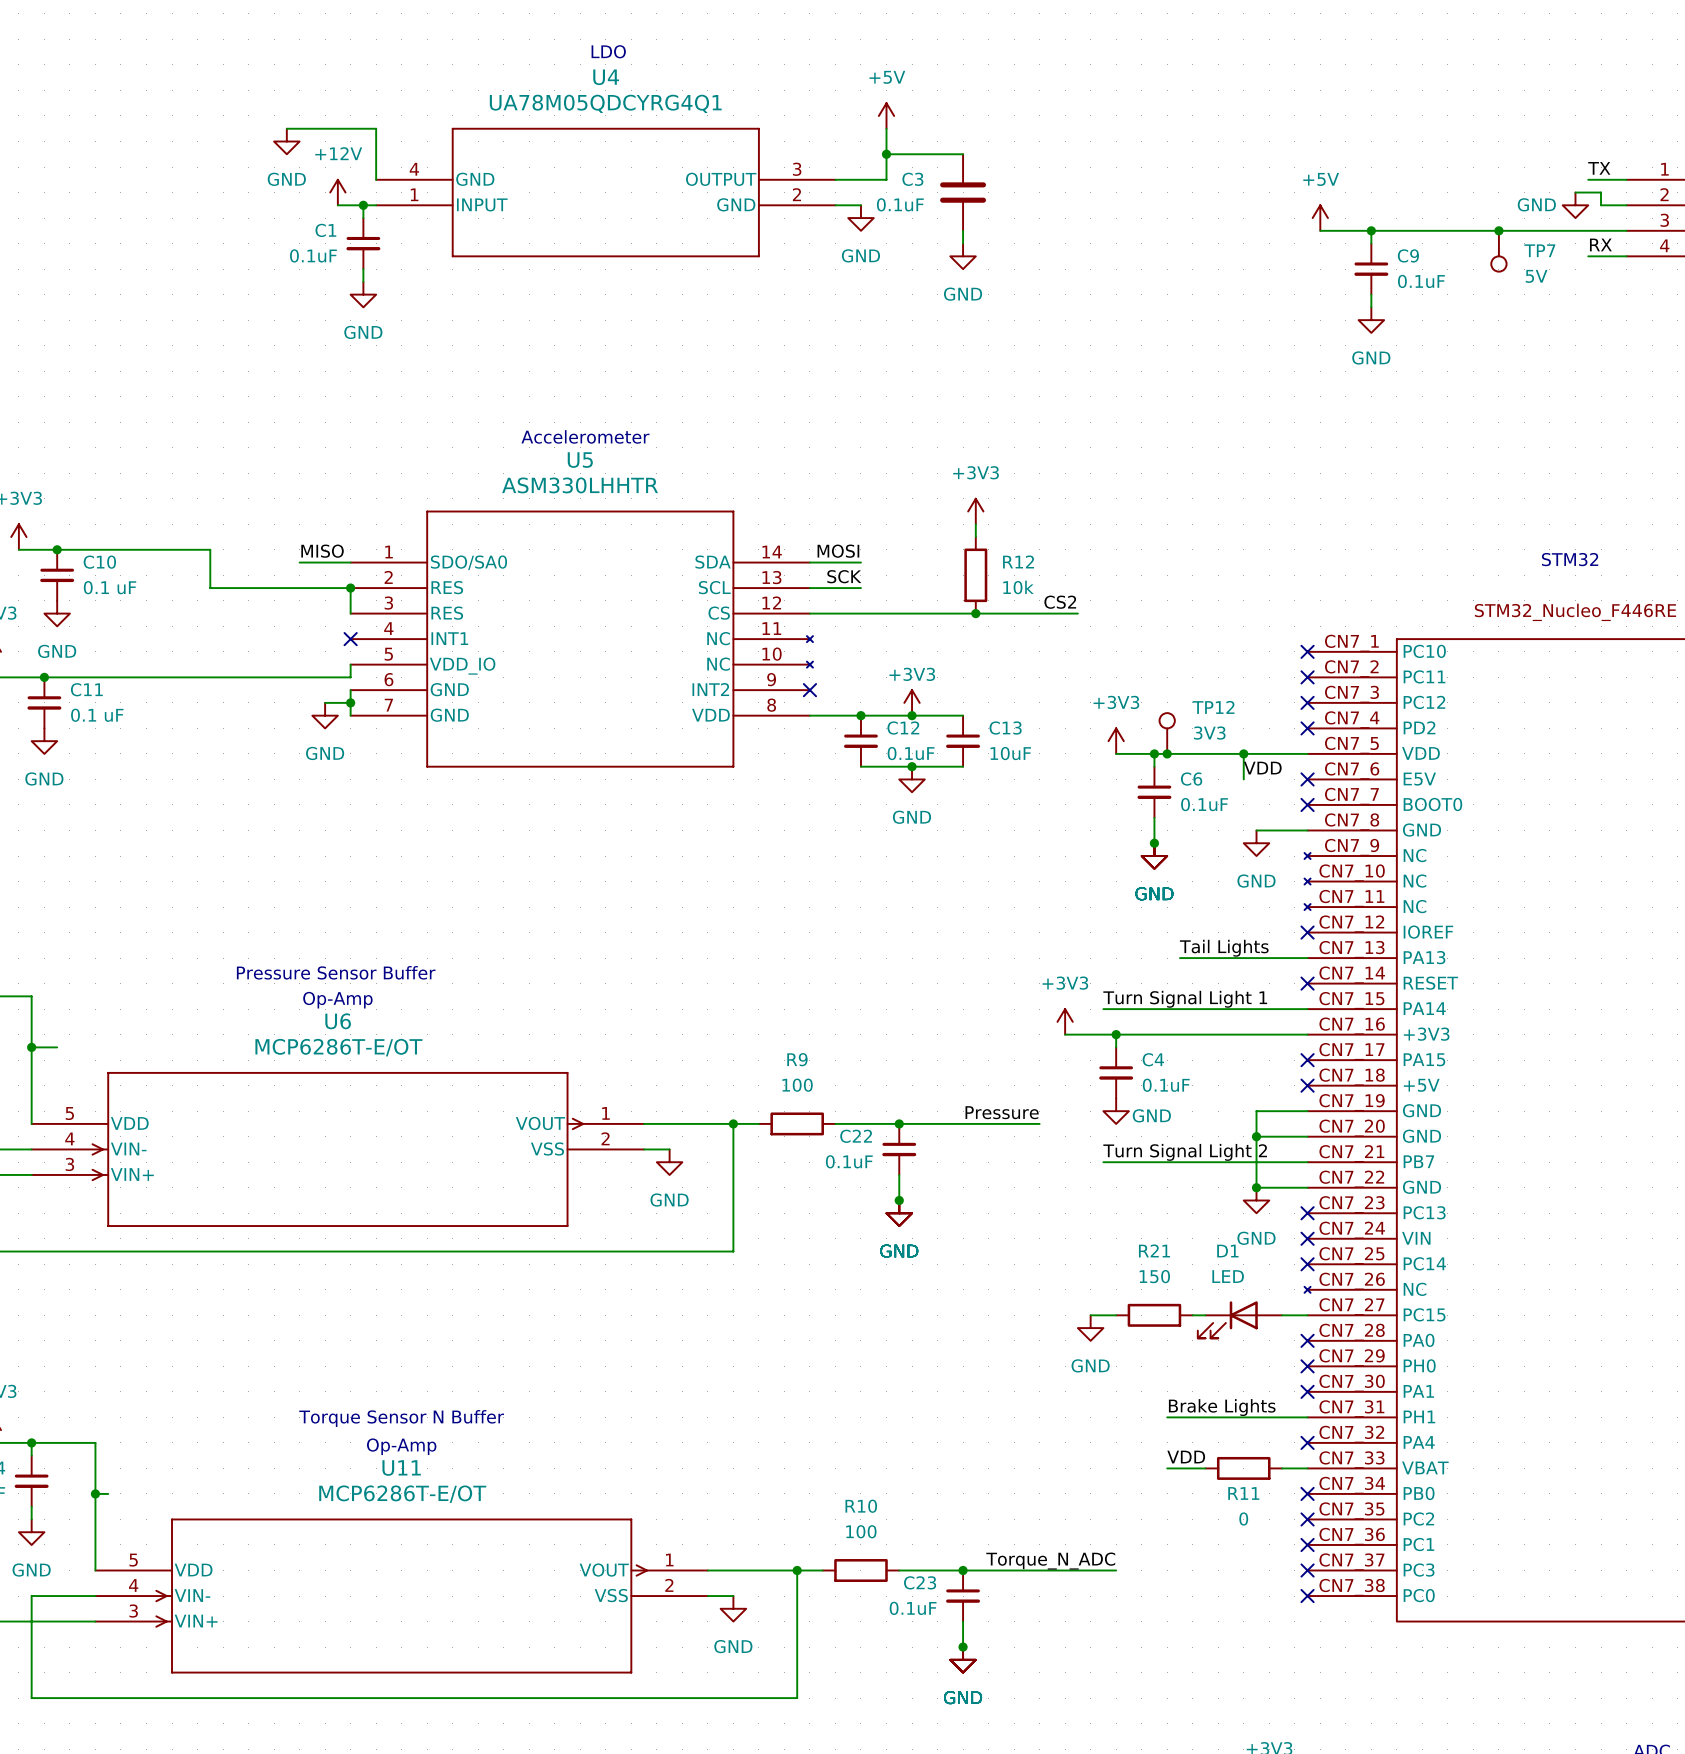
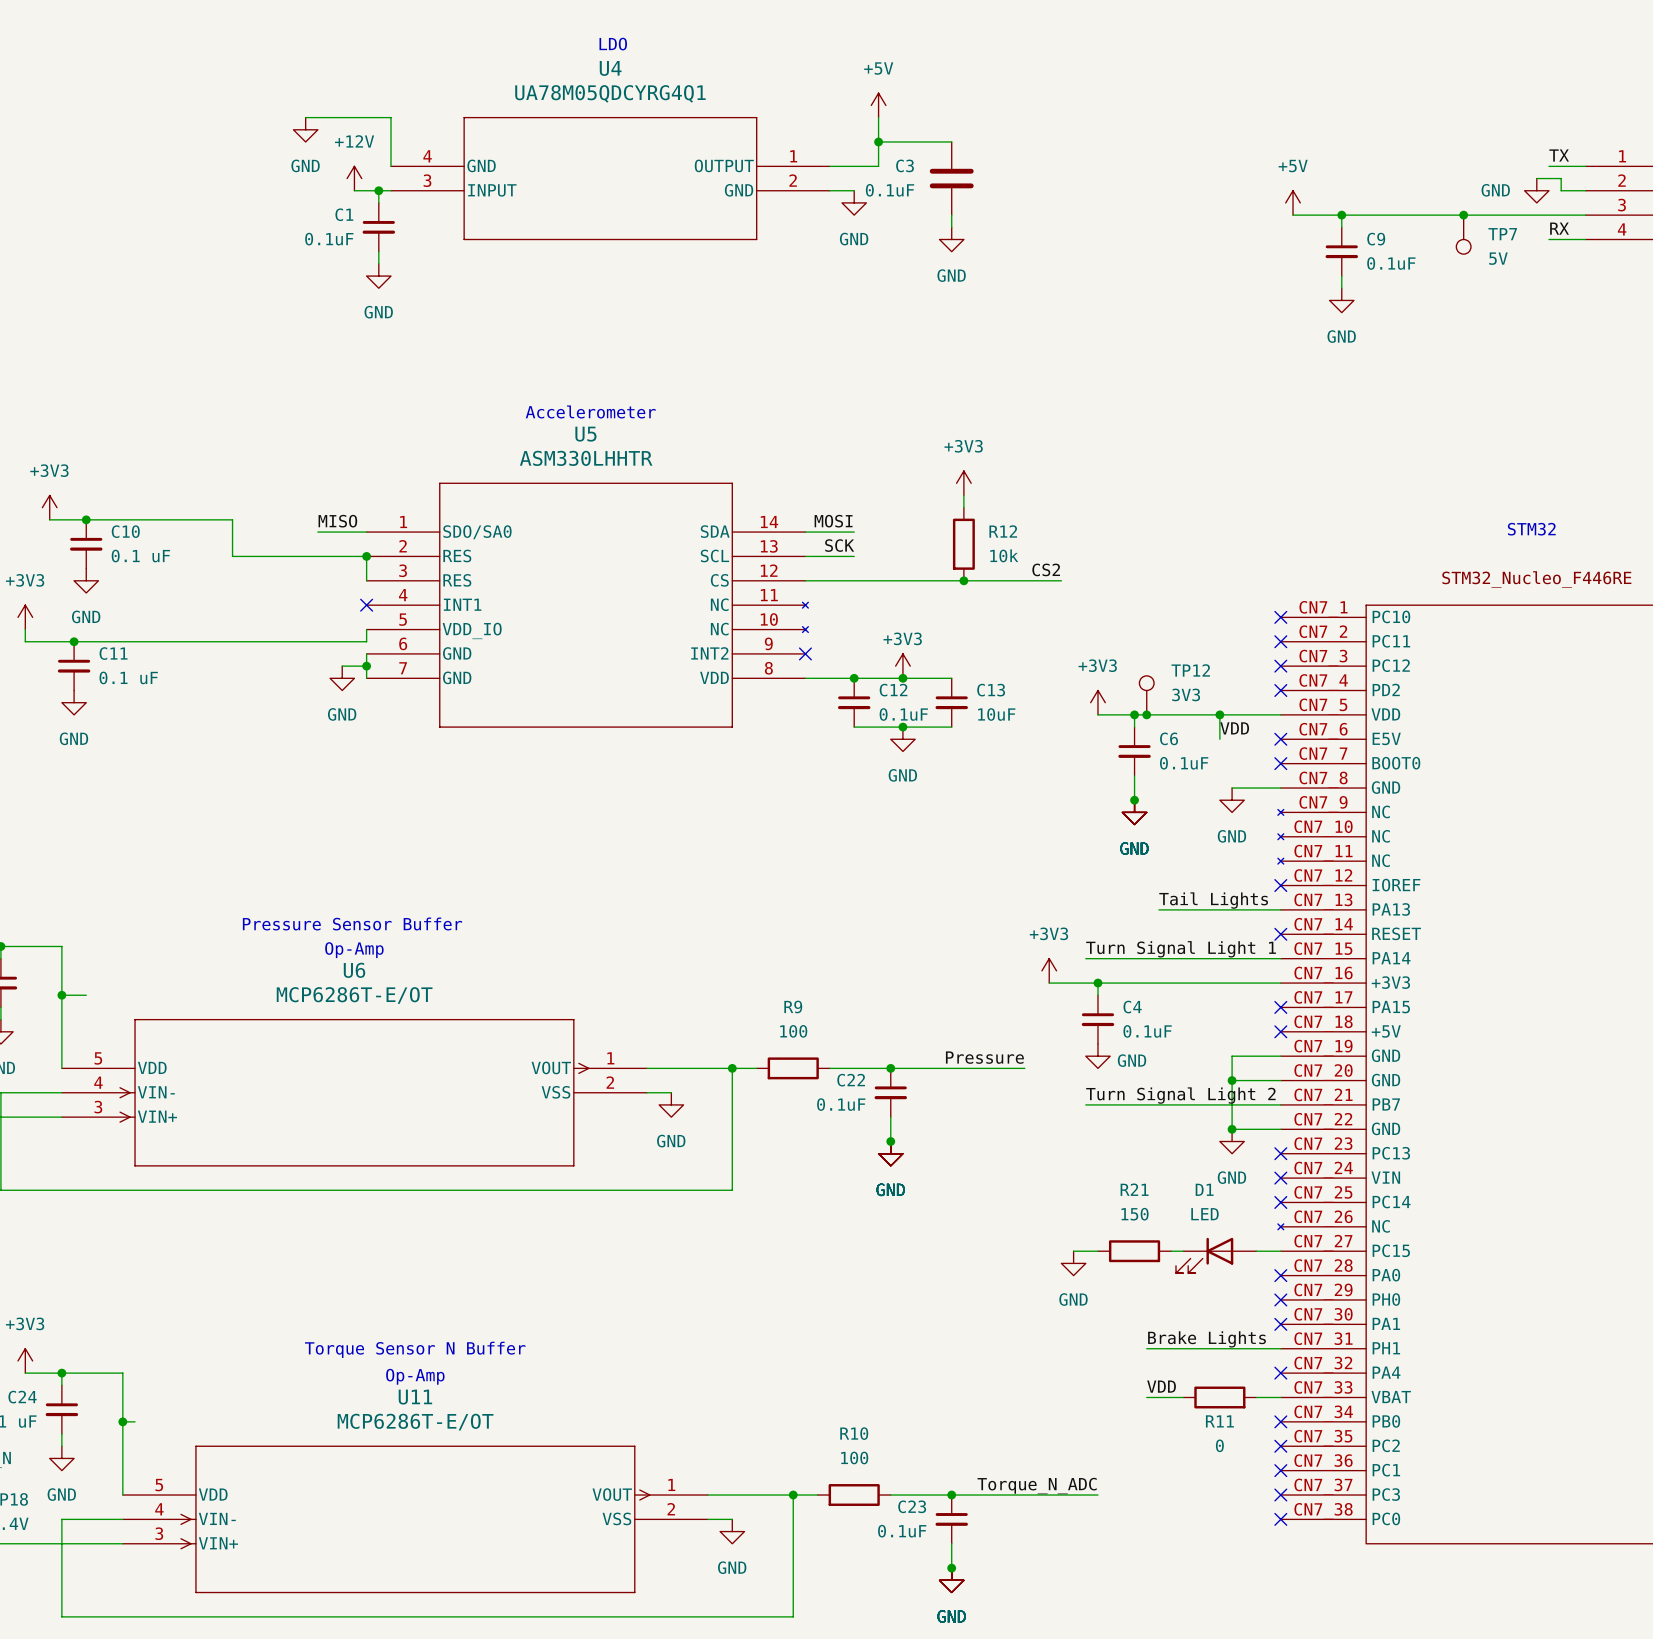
U4 pin number: 3 (797, 169) -> 1 (793, 156)
U4 pin number: 1 (414, 194) -> 3 (427, 180)

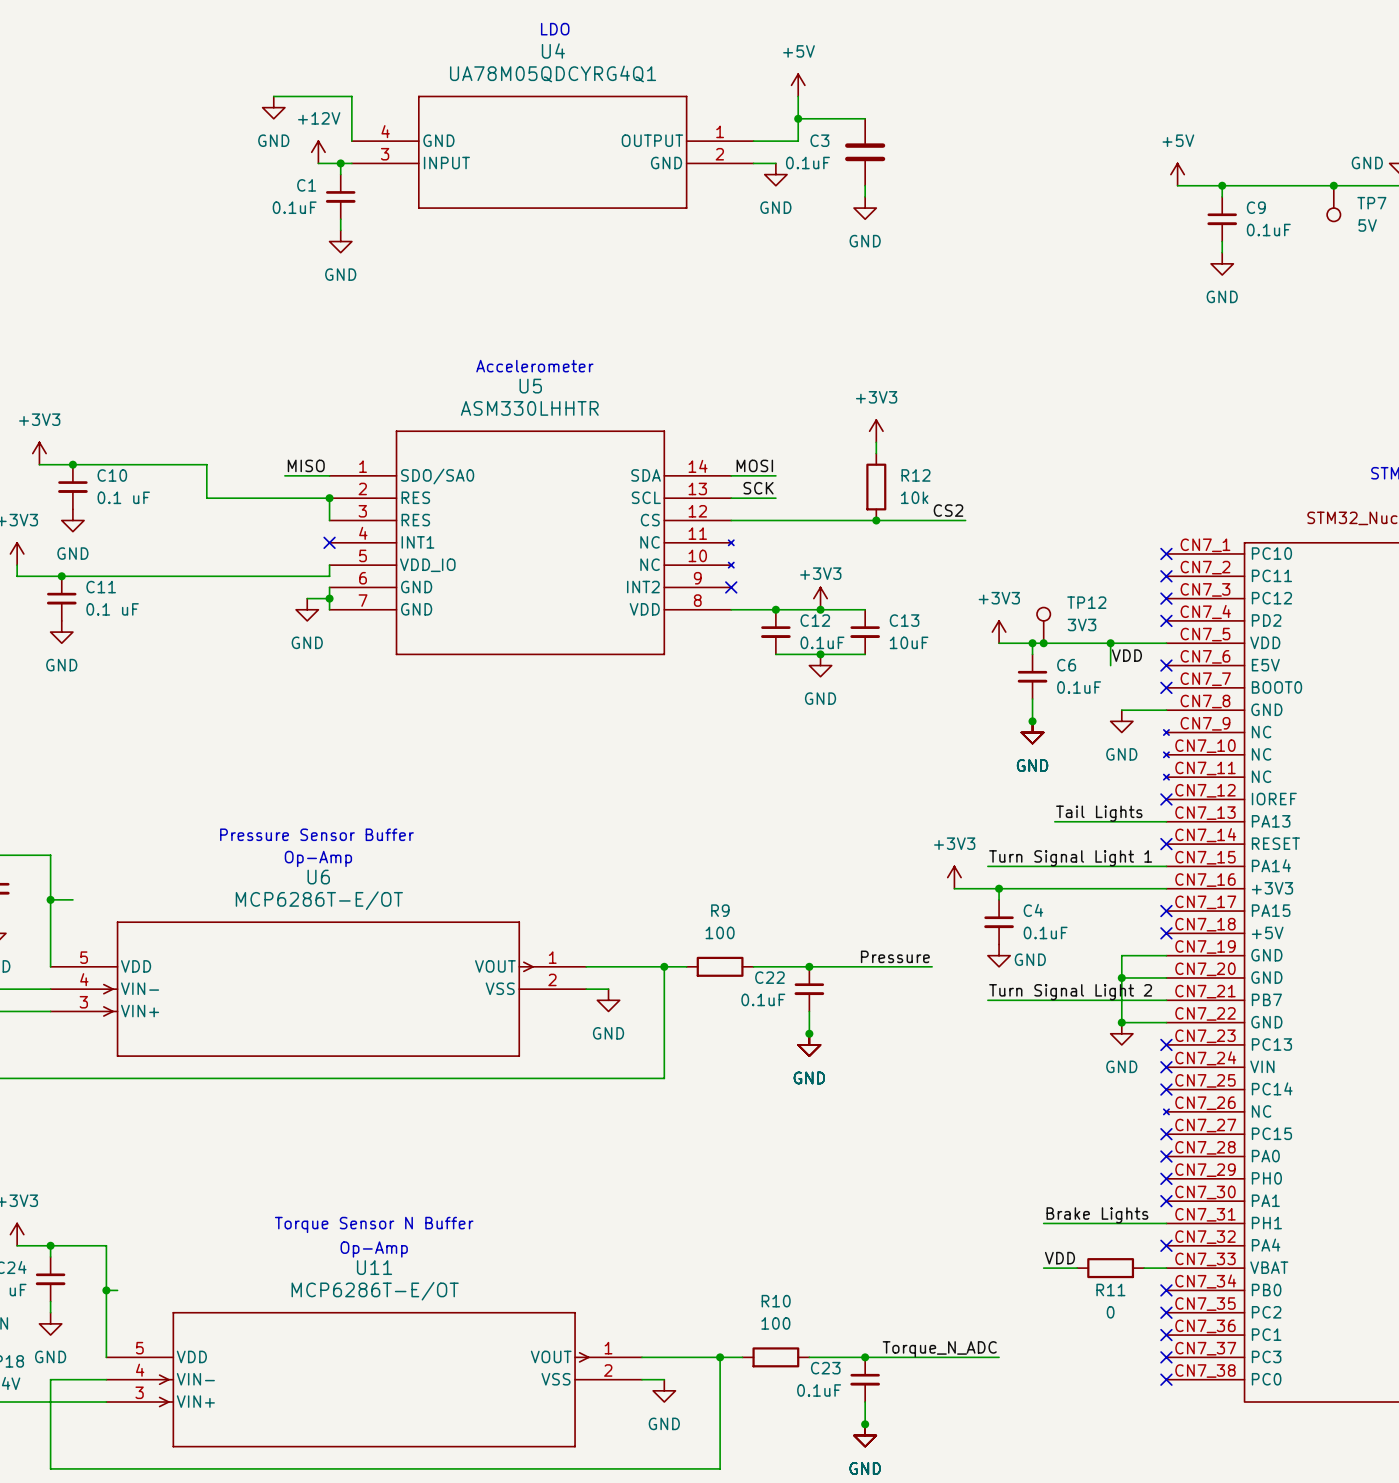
wire: (1073, 1251) (1097, 1251) -> none
R21: 150 (1134, 1251) -> none
wire: (1171, 1251) (1183, 1251) -> none
wire: (1256, 1251) (1280, 1251) -> none
no-connect mark: none -> (1166, 1134)
D1: LED (1216, 1255) -> none
power symbol: GND (1073, 1263) -> none

